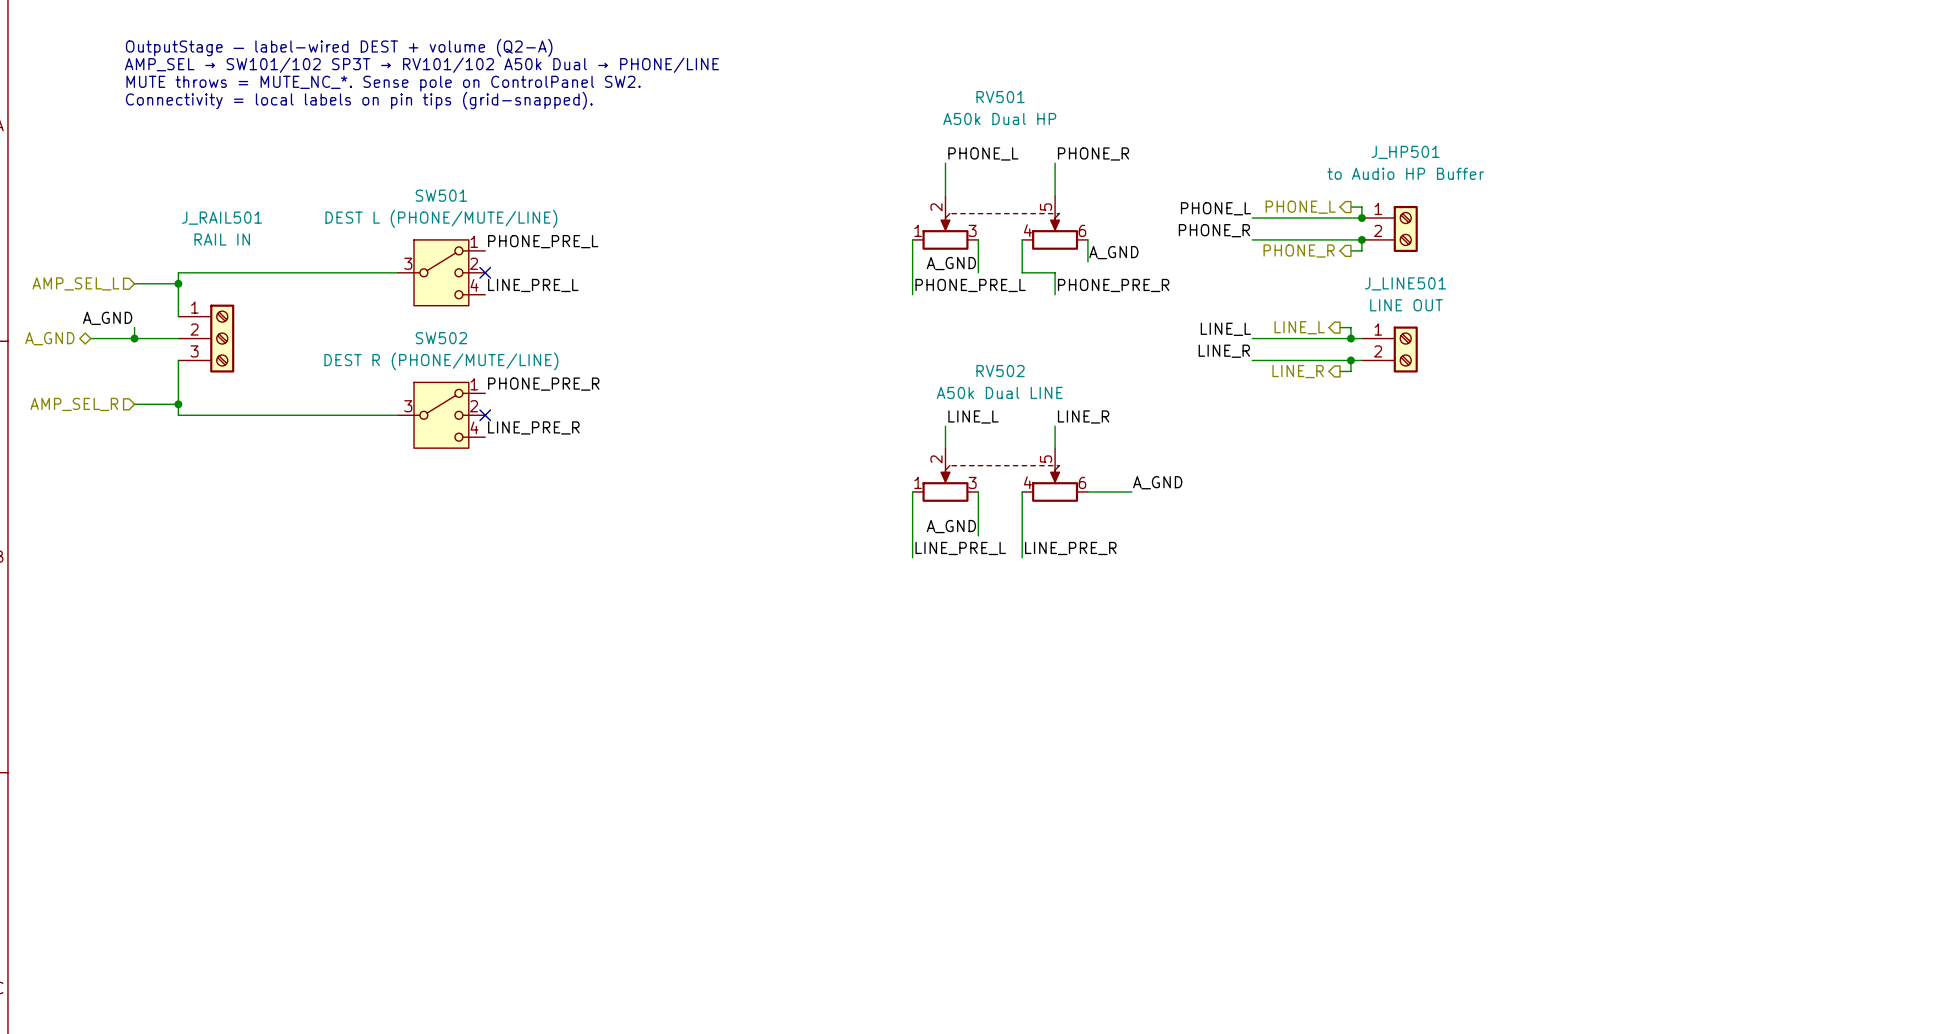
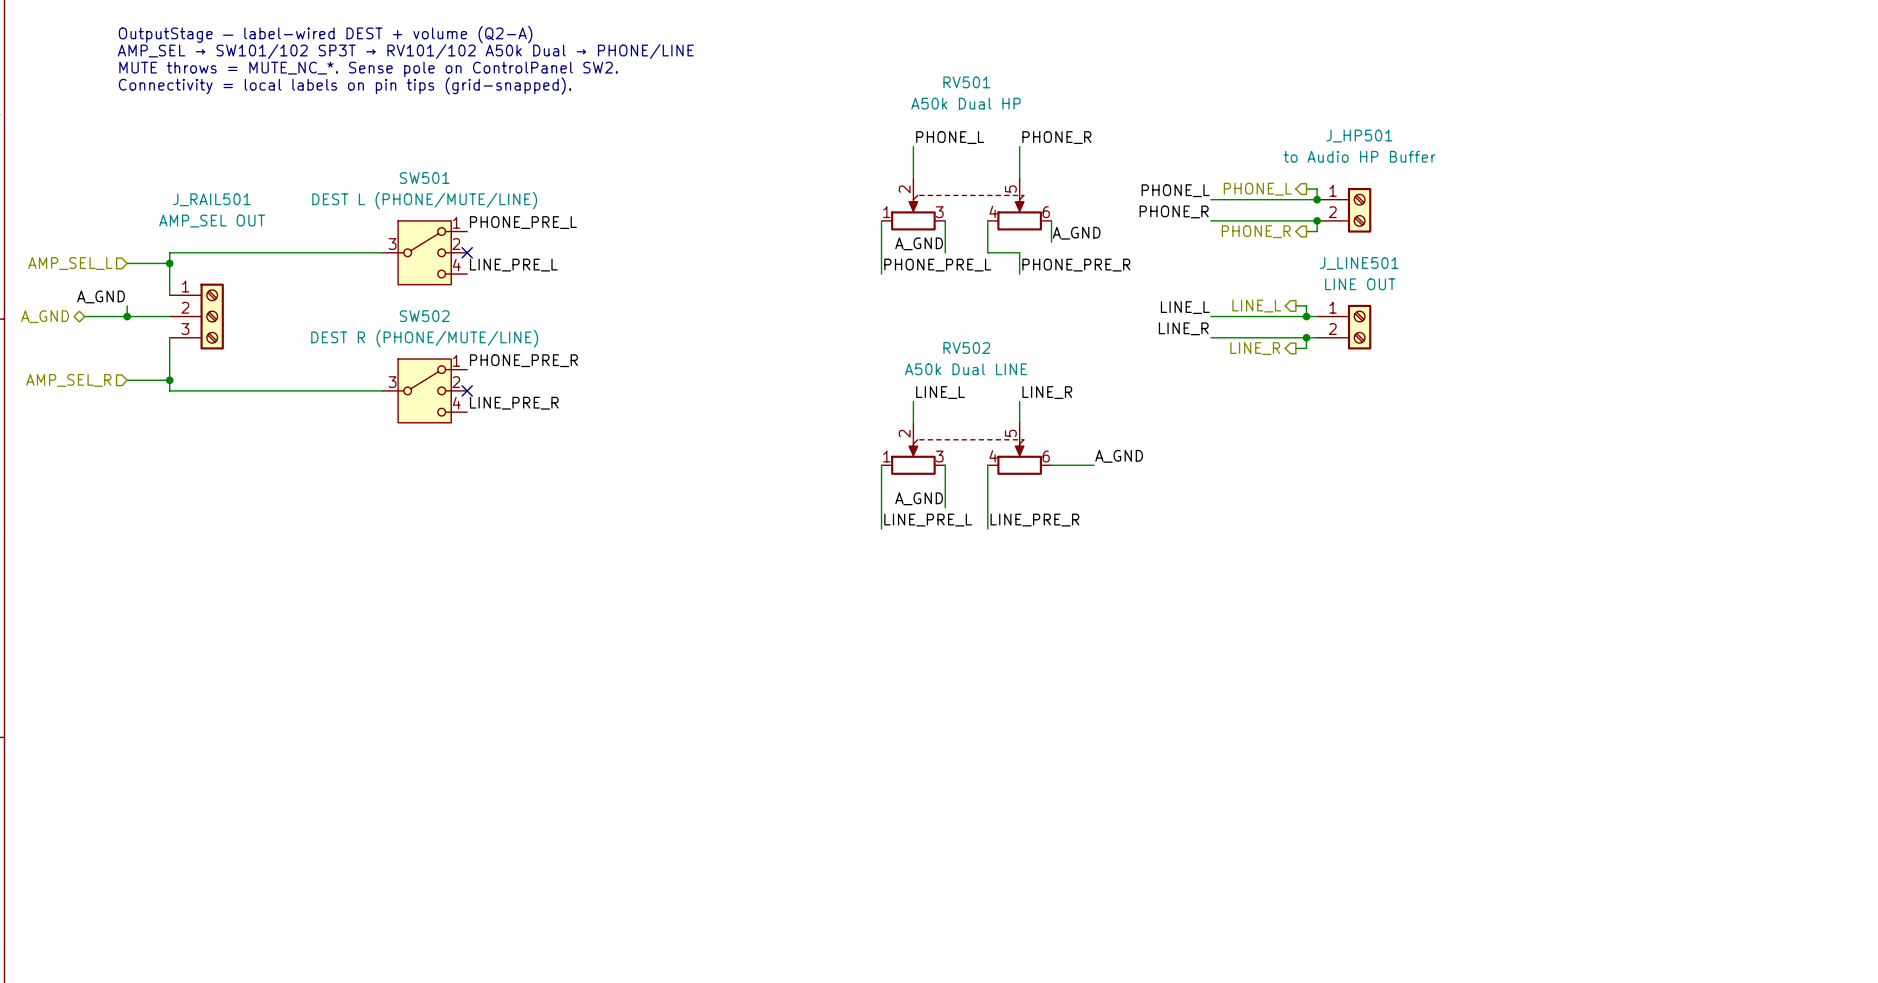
J_RAIL501 value: RAIL IN (222, 239) -> AMP_SEL OUT (212, 221)

